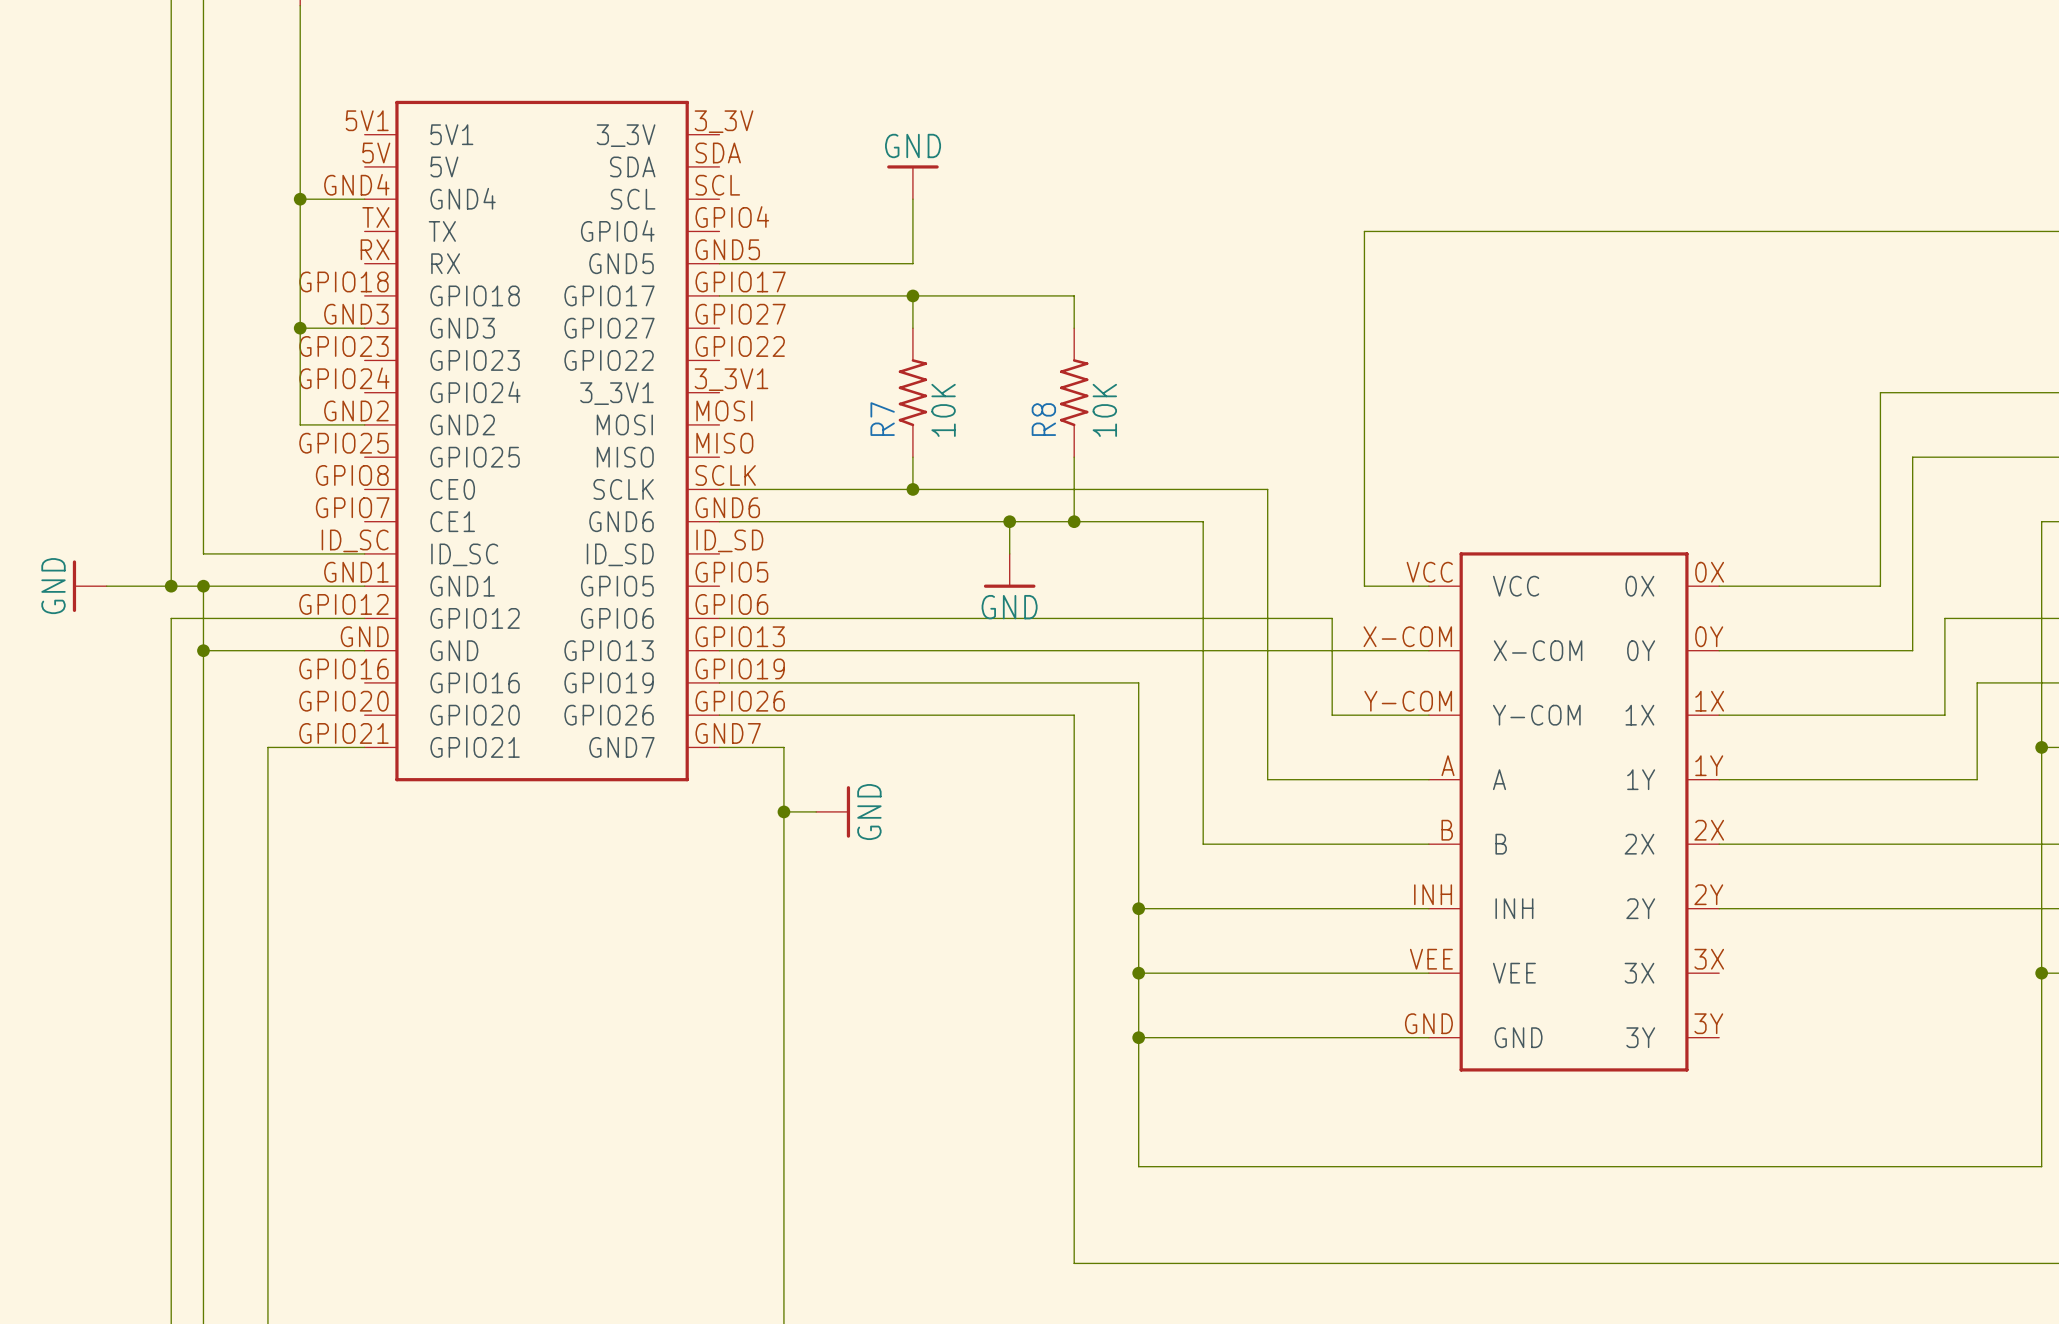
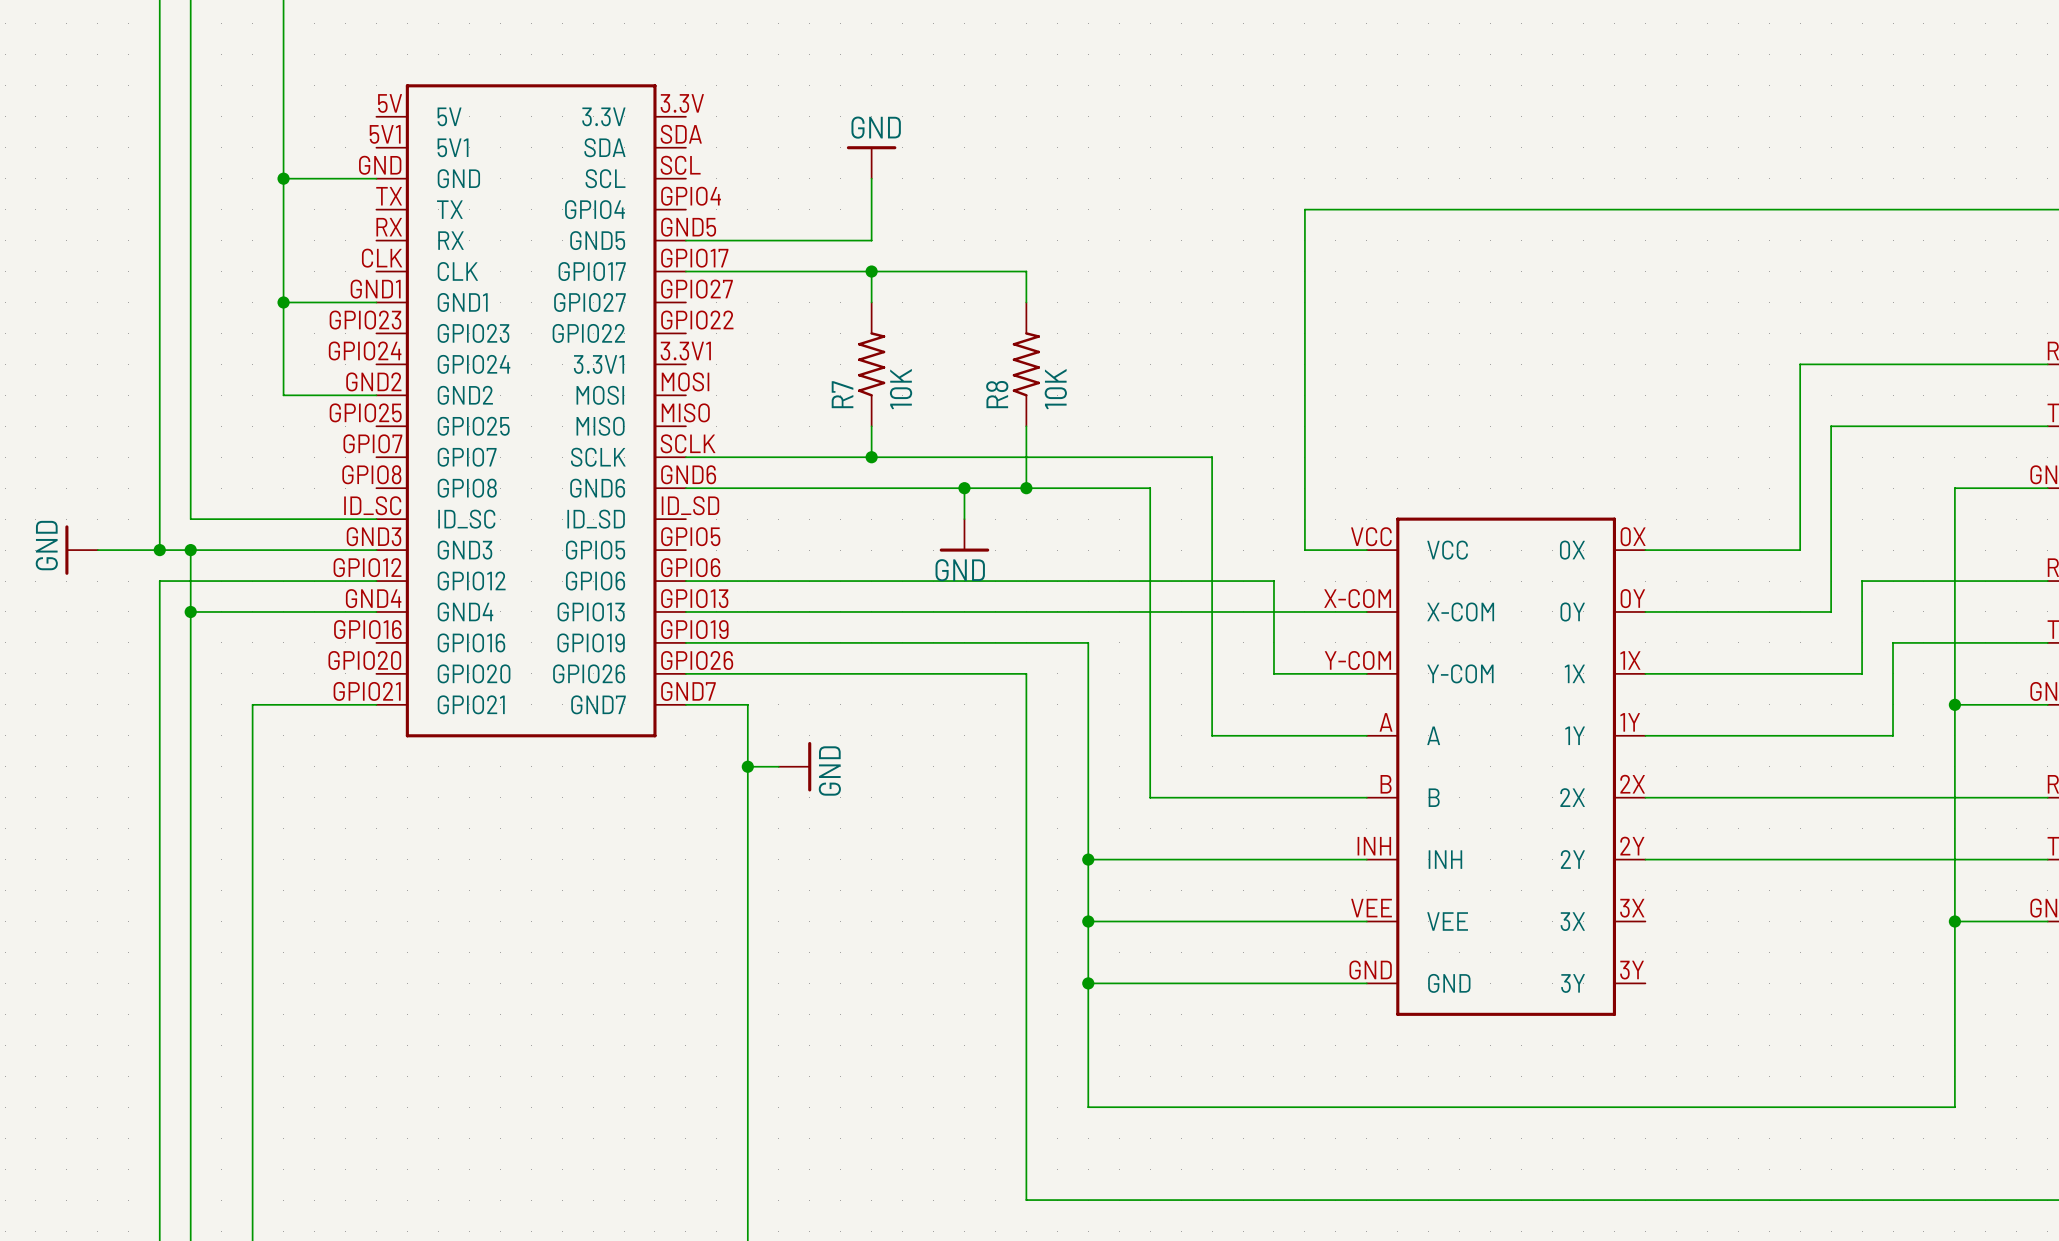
part: (542, 441) -> none
part: none -> (531, 410)

